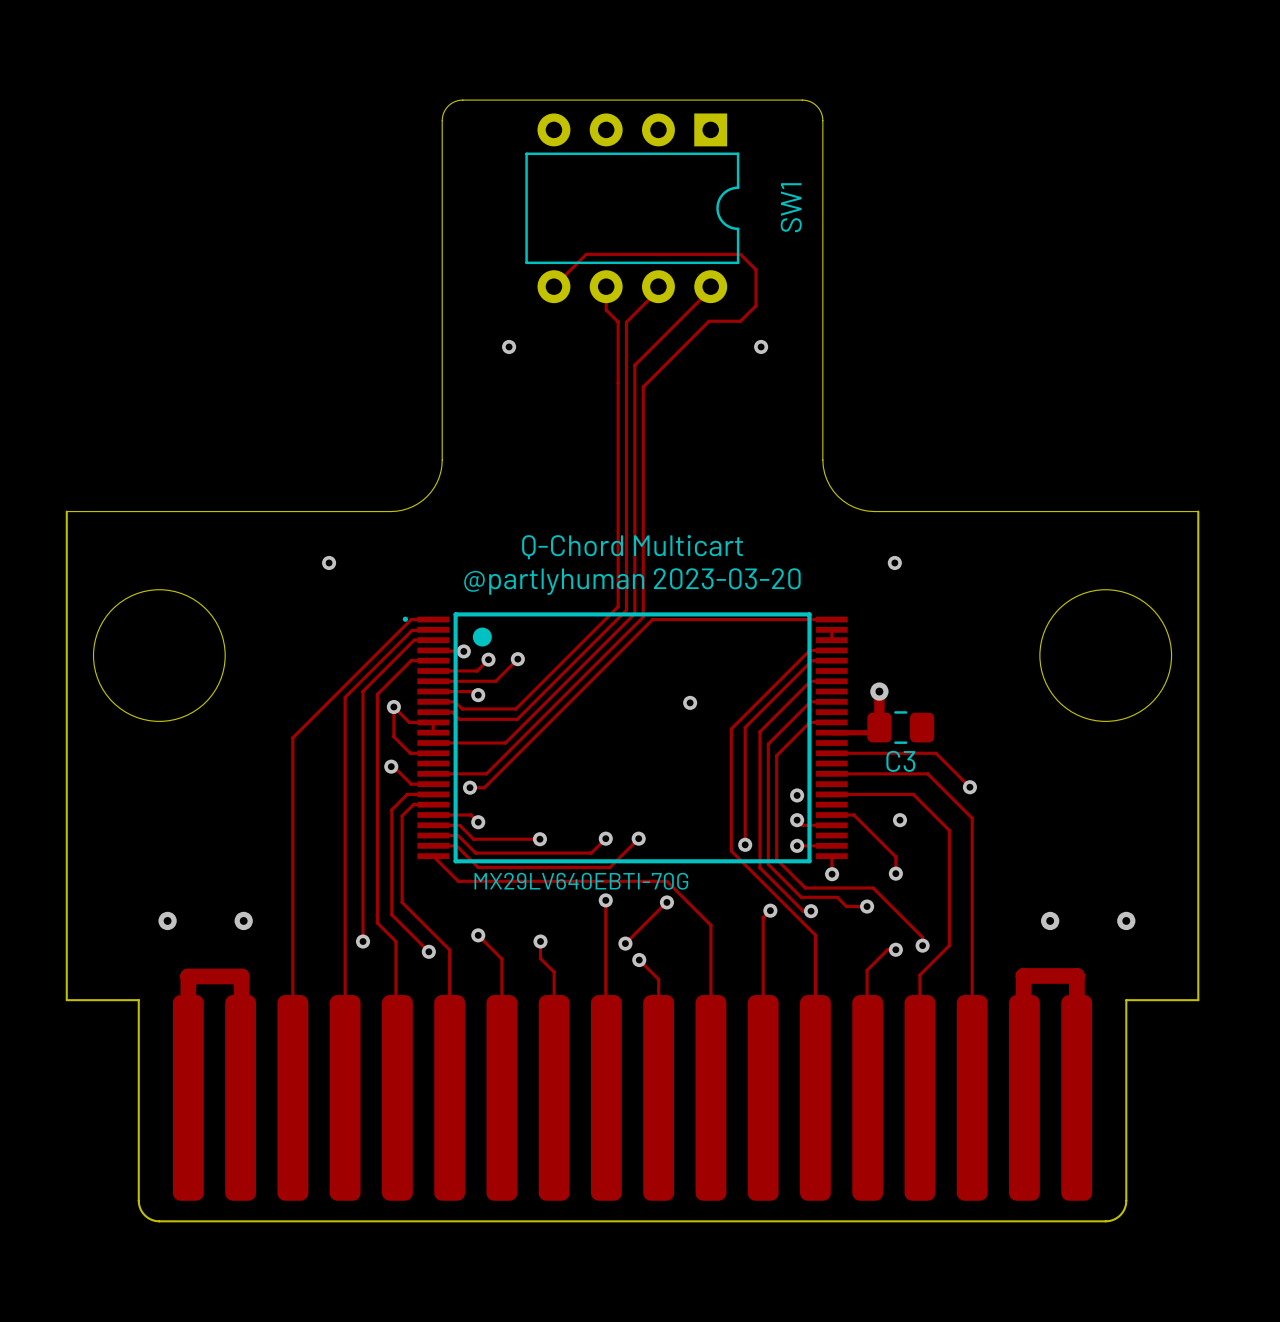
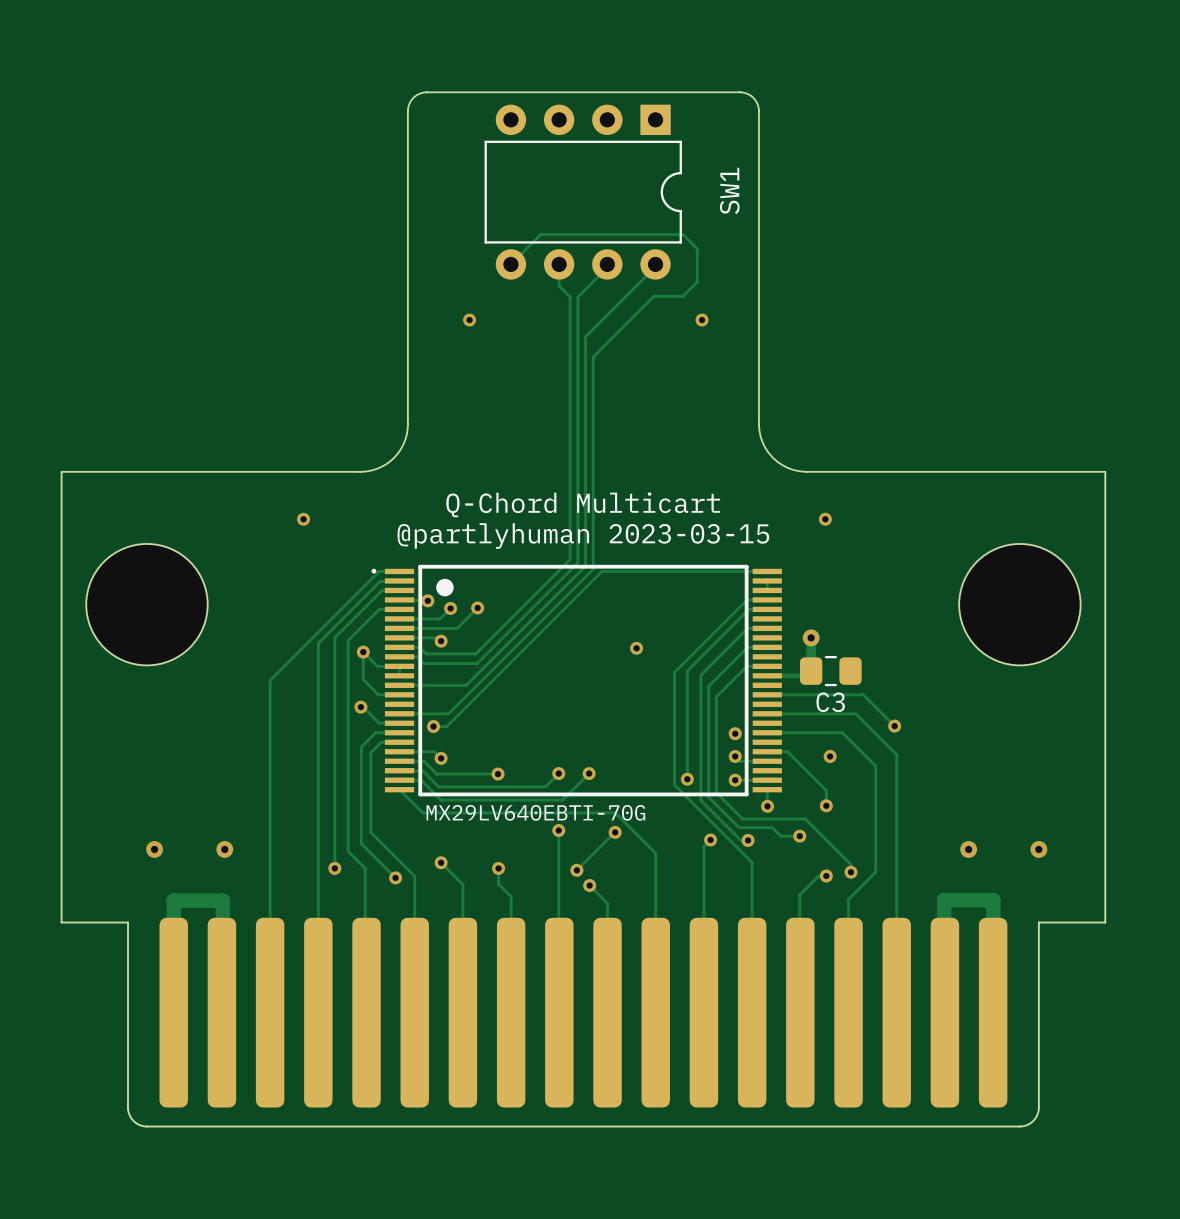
text: @partlyhuman 2023-03-20 (632, 581) -> @partlyhuman 2023-03-15 (583, 535)

